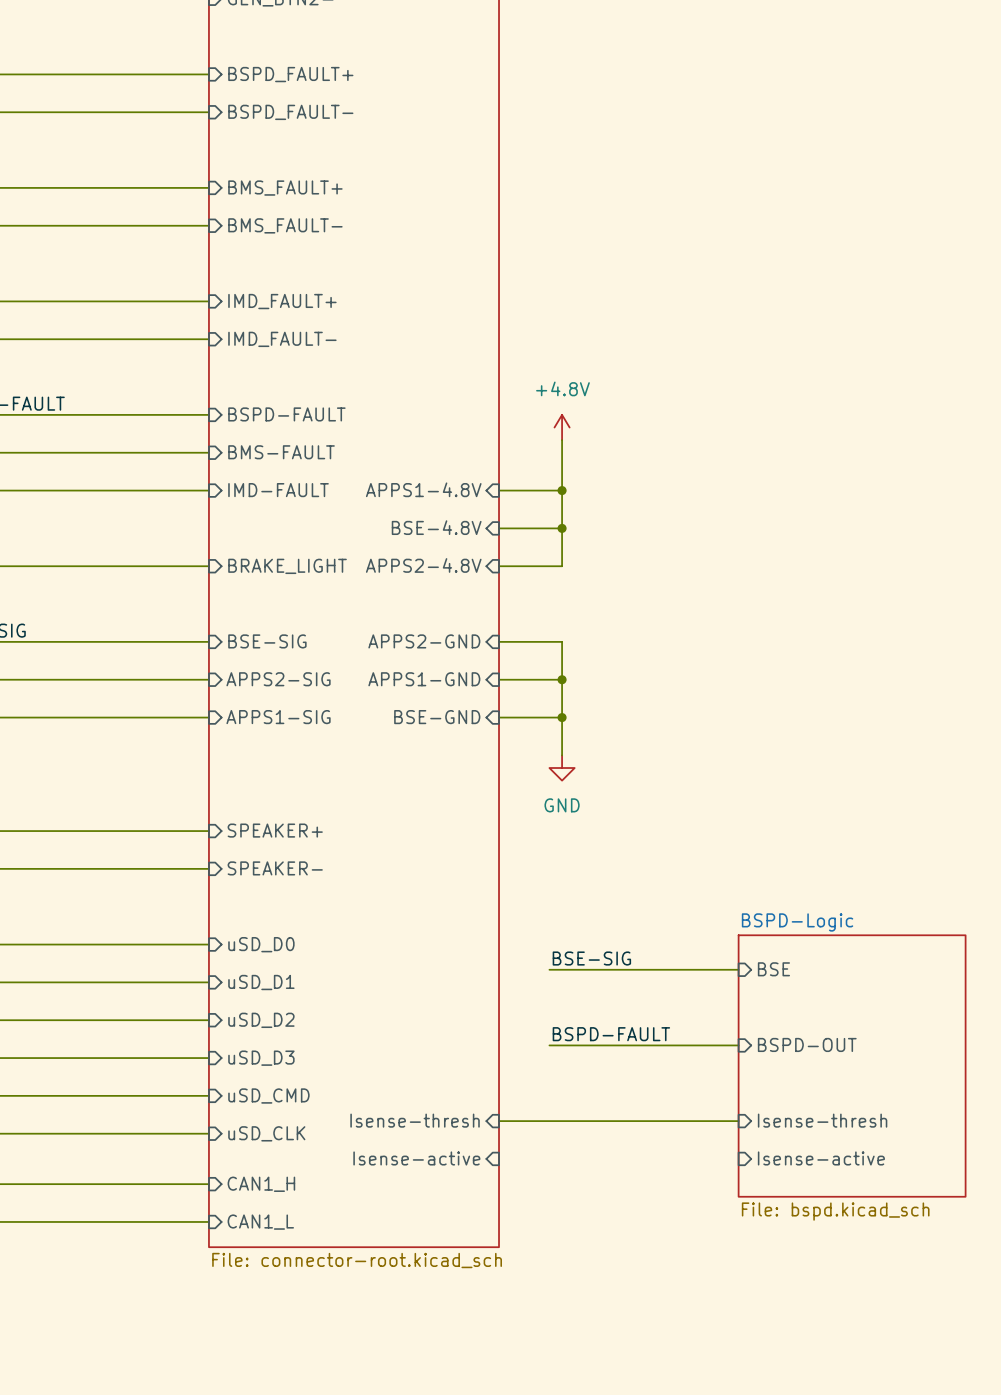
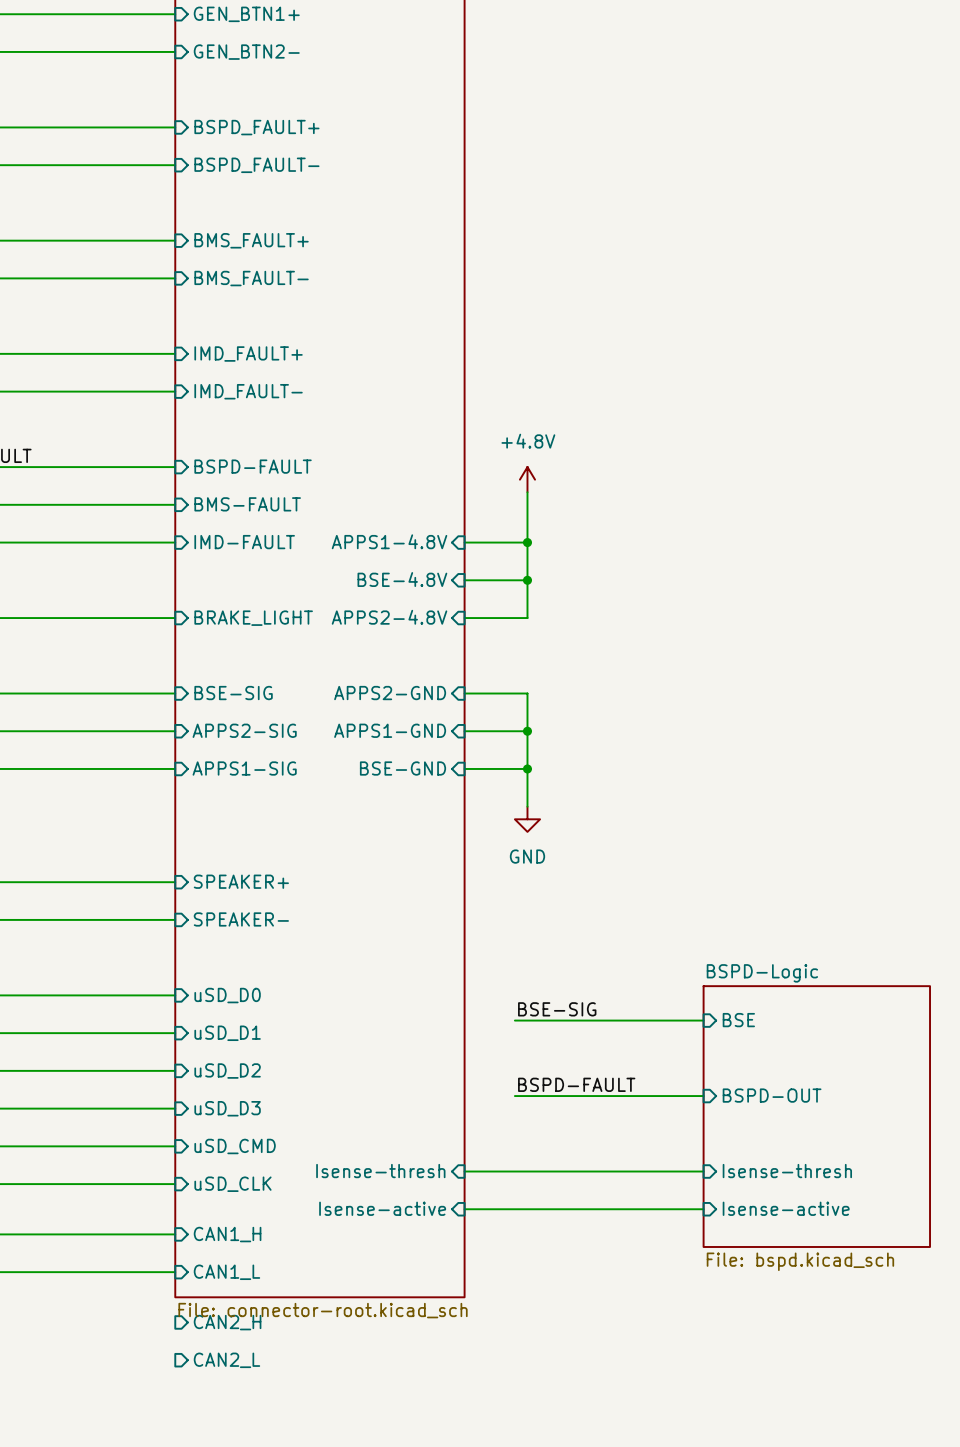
wire: none -> (464, 1209) (703, 1209)
sheet pin: none -> CAN2_H (227, 1322)
sheet pin: none -> CAN2_L (226, 1360)

